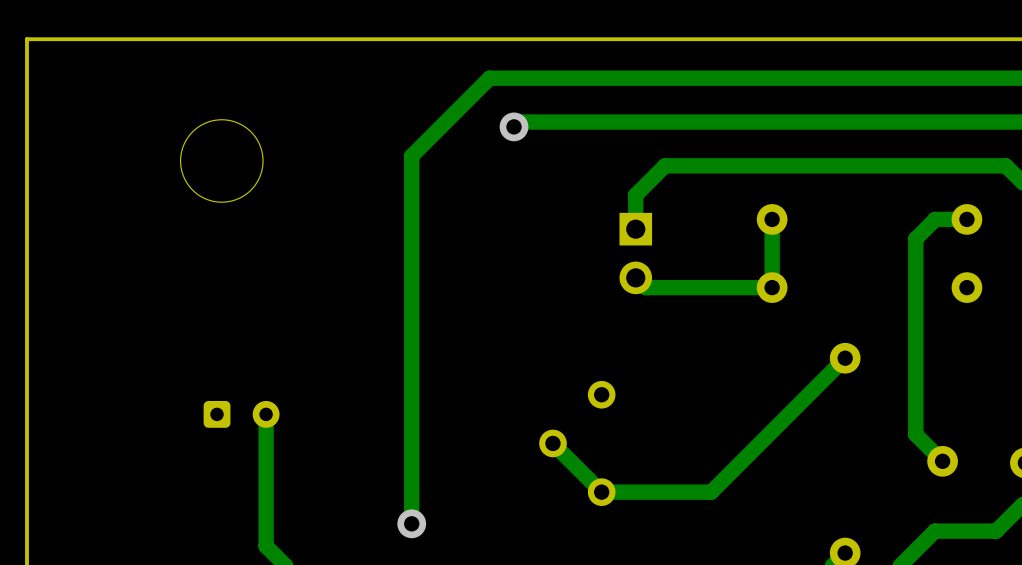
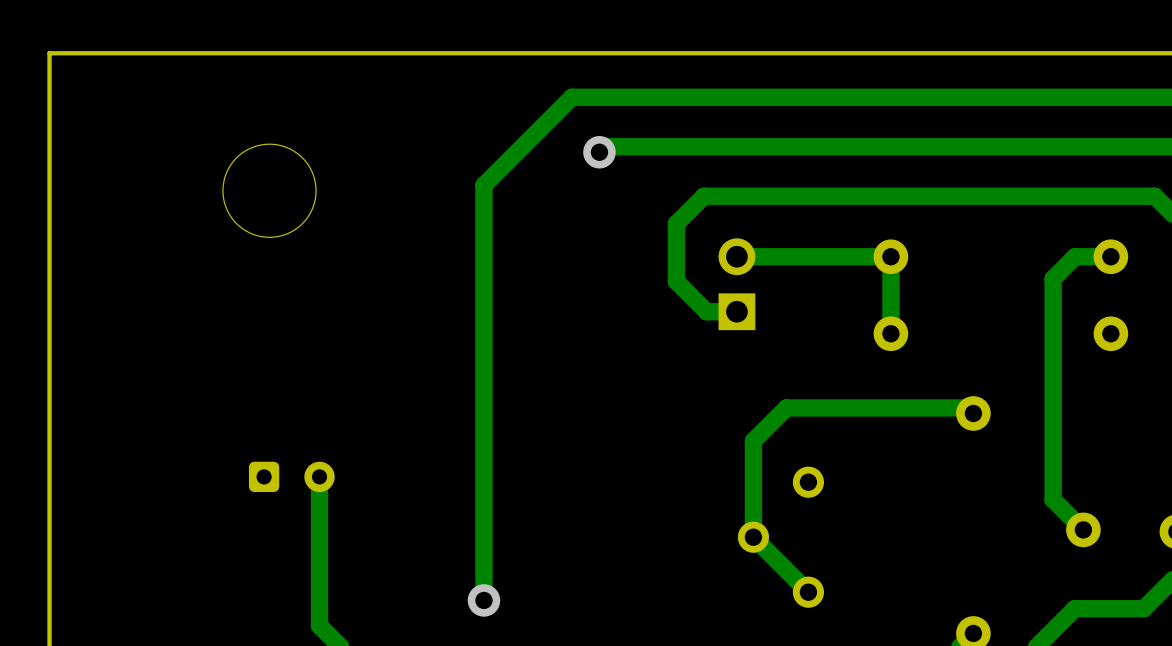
track: (664, 165) (635, 195) (635, 229) -> (769, 196) (703, 196) (676, 223) (676, 281) (706, 311) (736, 311)
track: none -> (896, 256) (736, 256)
part rotation: 0° (635, 253) -> 180° (736, 284)
track: (635, 277) (645, 287) (772, 287) -> none
track: none -> (978, 407) (786, 407) (753, 440) (753, 537) (808, 592)
track: (845, 358) (711, 492) (601, 492) (552, 443) -> none
part position: (577, 443) -> (780, 537)

